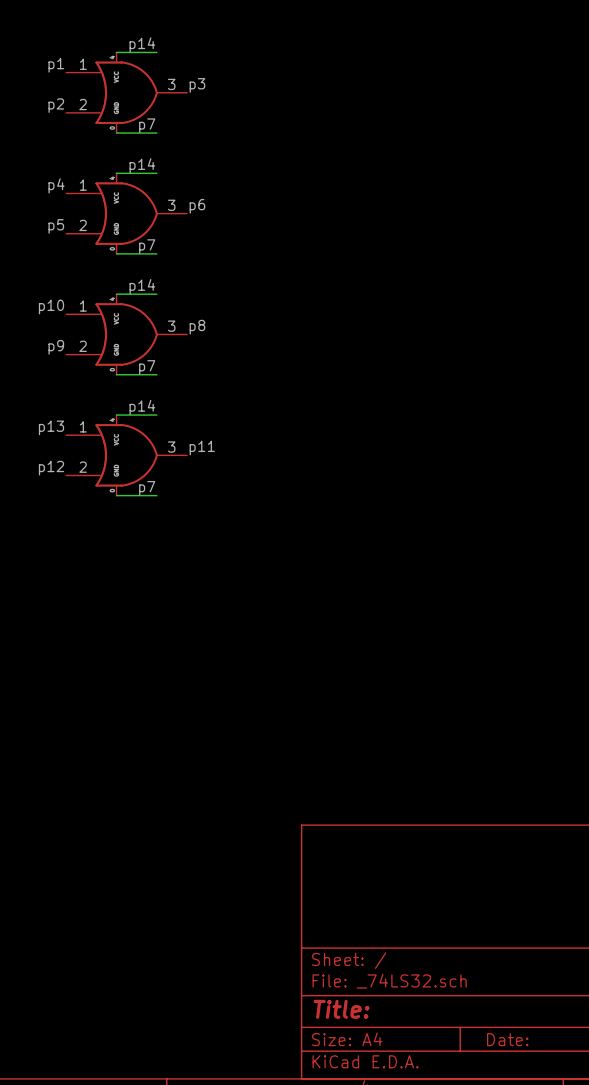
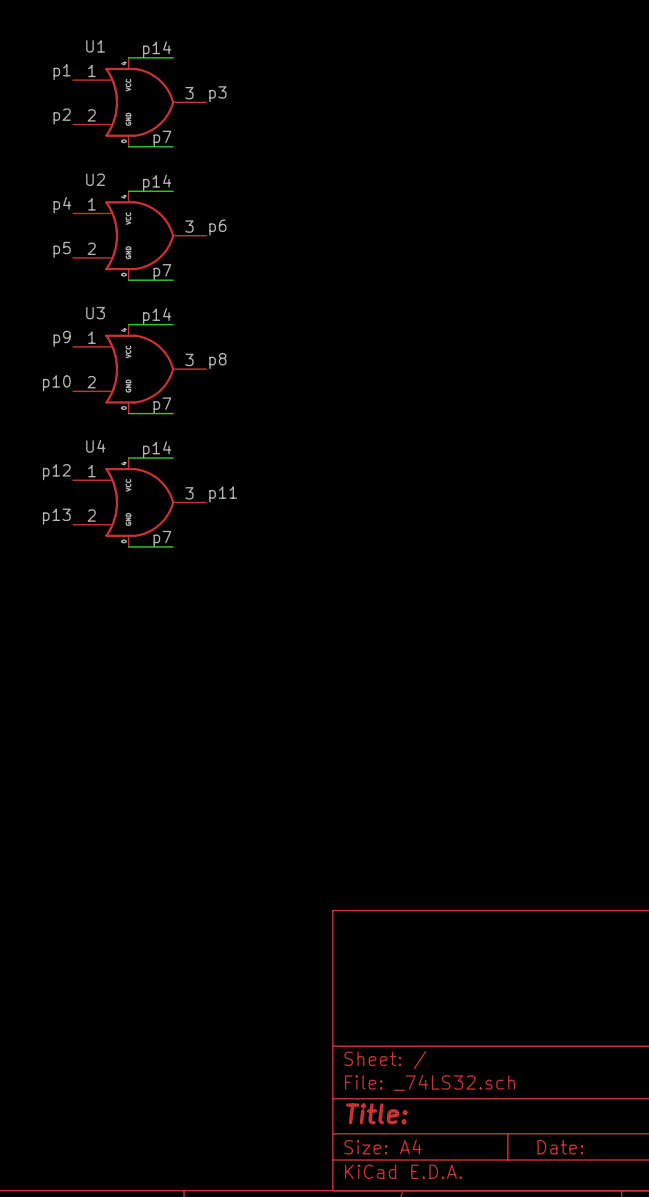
U1 name: none -> U1 (95, 46)
U2 name: none -> U2 (95, 179)
U3 name: none -> U3 (95, 313)
label: p10 (51, 307) -> p9 (62, 338)
label: p9 (56, 347) -> p10 (56, 383)
U4 name: none -> U4 (95, 446)
label: p13 (51, 427) -> p12 (56, 472)
label: p12 (51, 468) -> p13 (56, 516)

